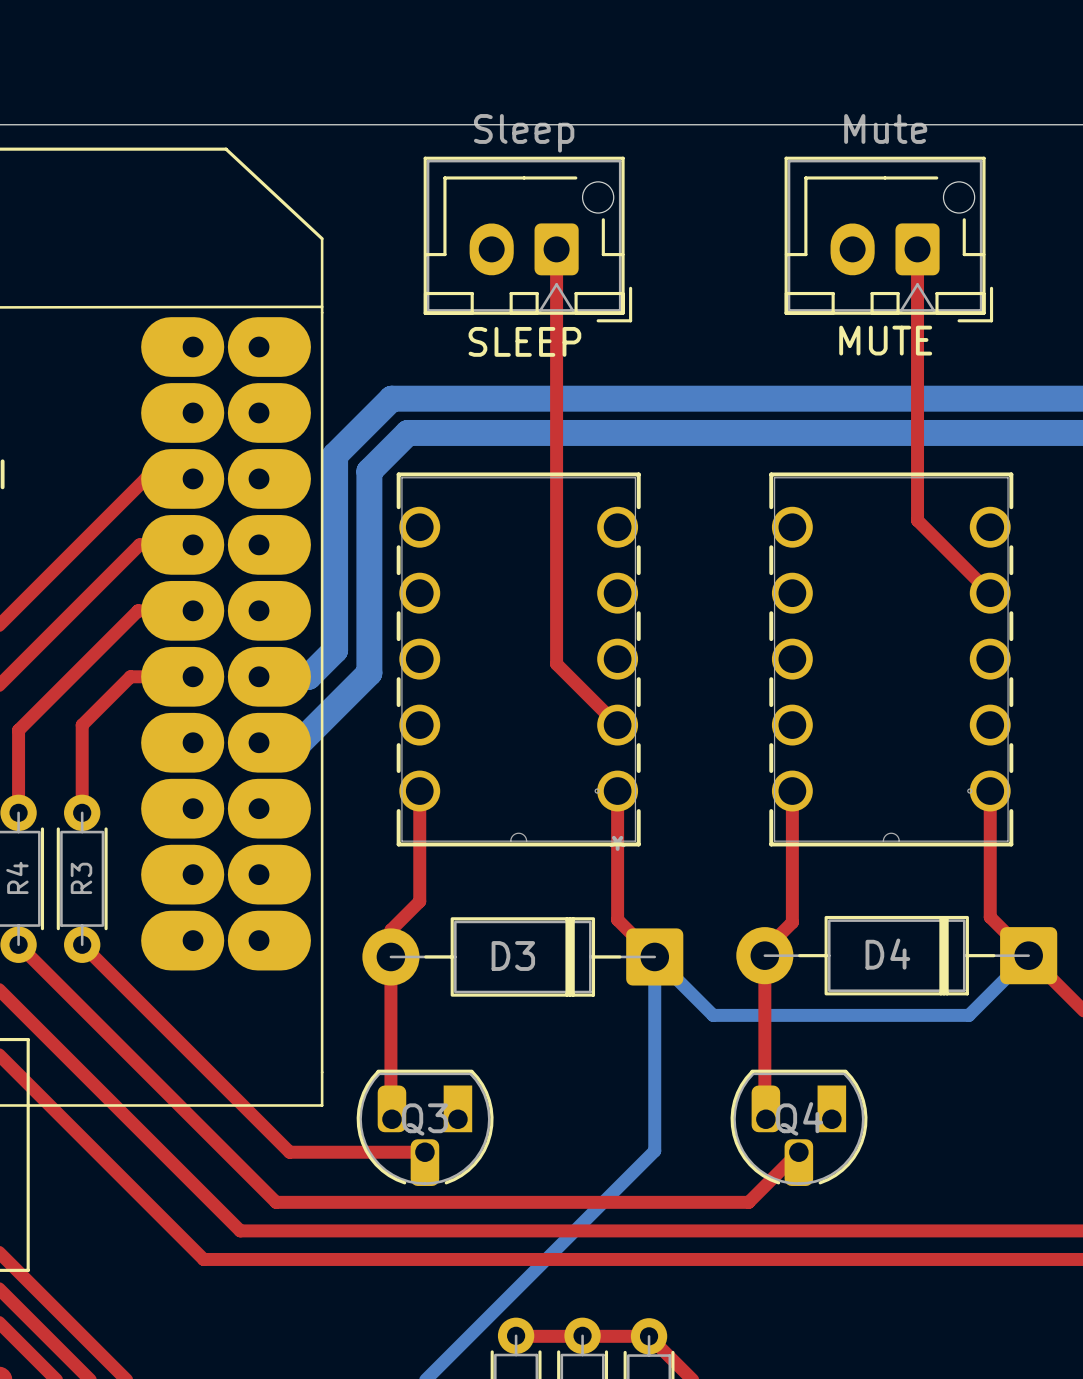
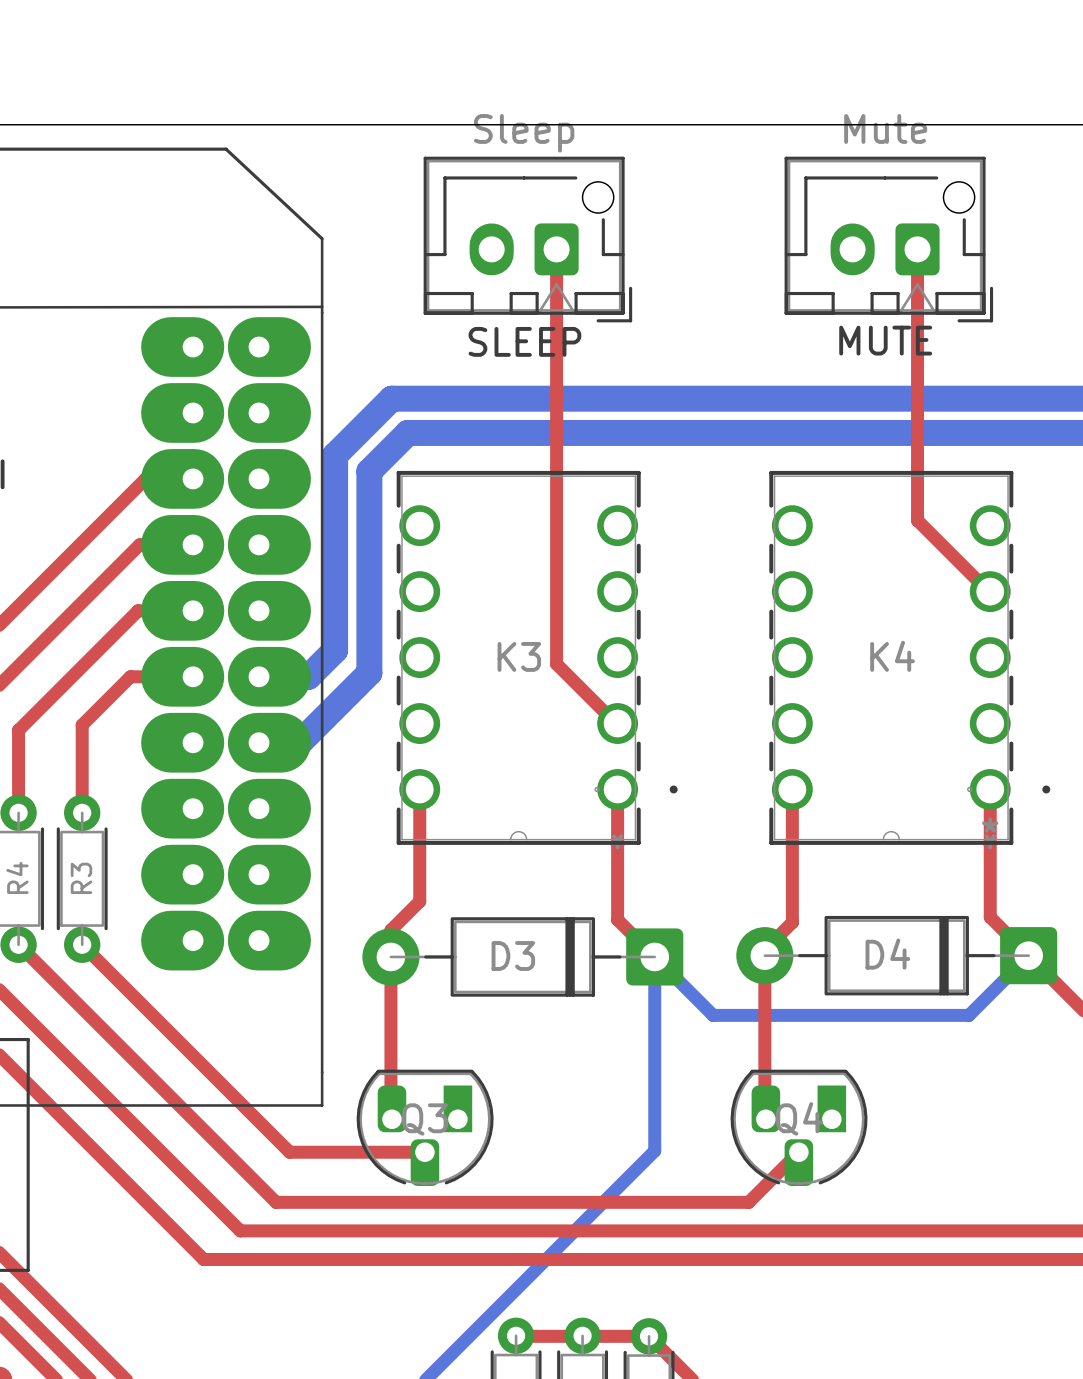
K3: none -> (537, 657)
K4: none -> (909, 657)
part: (518, 659) -> none
part: (891, 659) -> none

